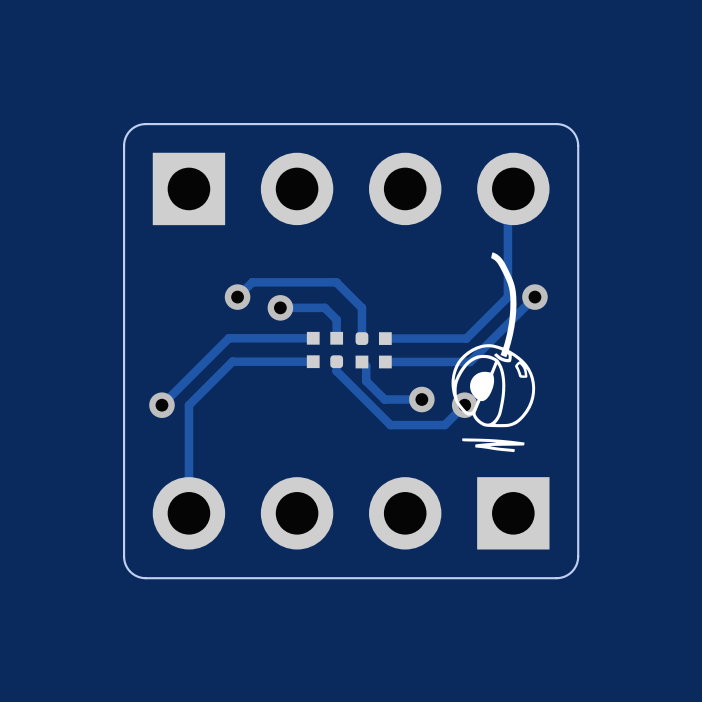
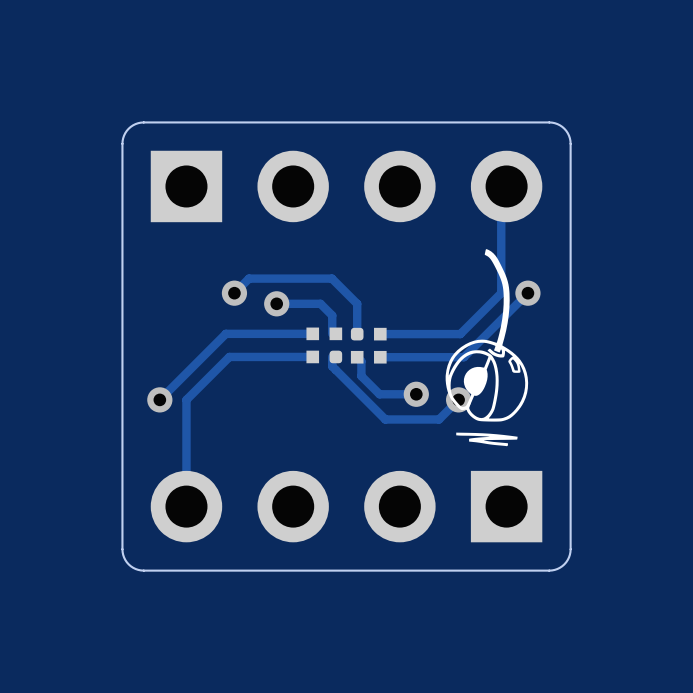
part footprint: [306, 331, 351, 376] -> [306, 327, 343, 364]

